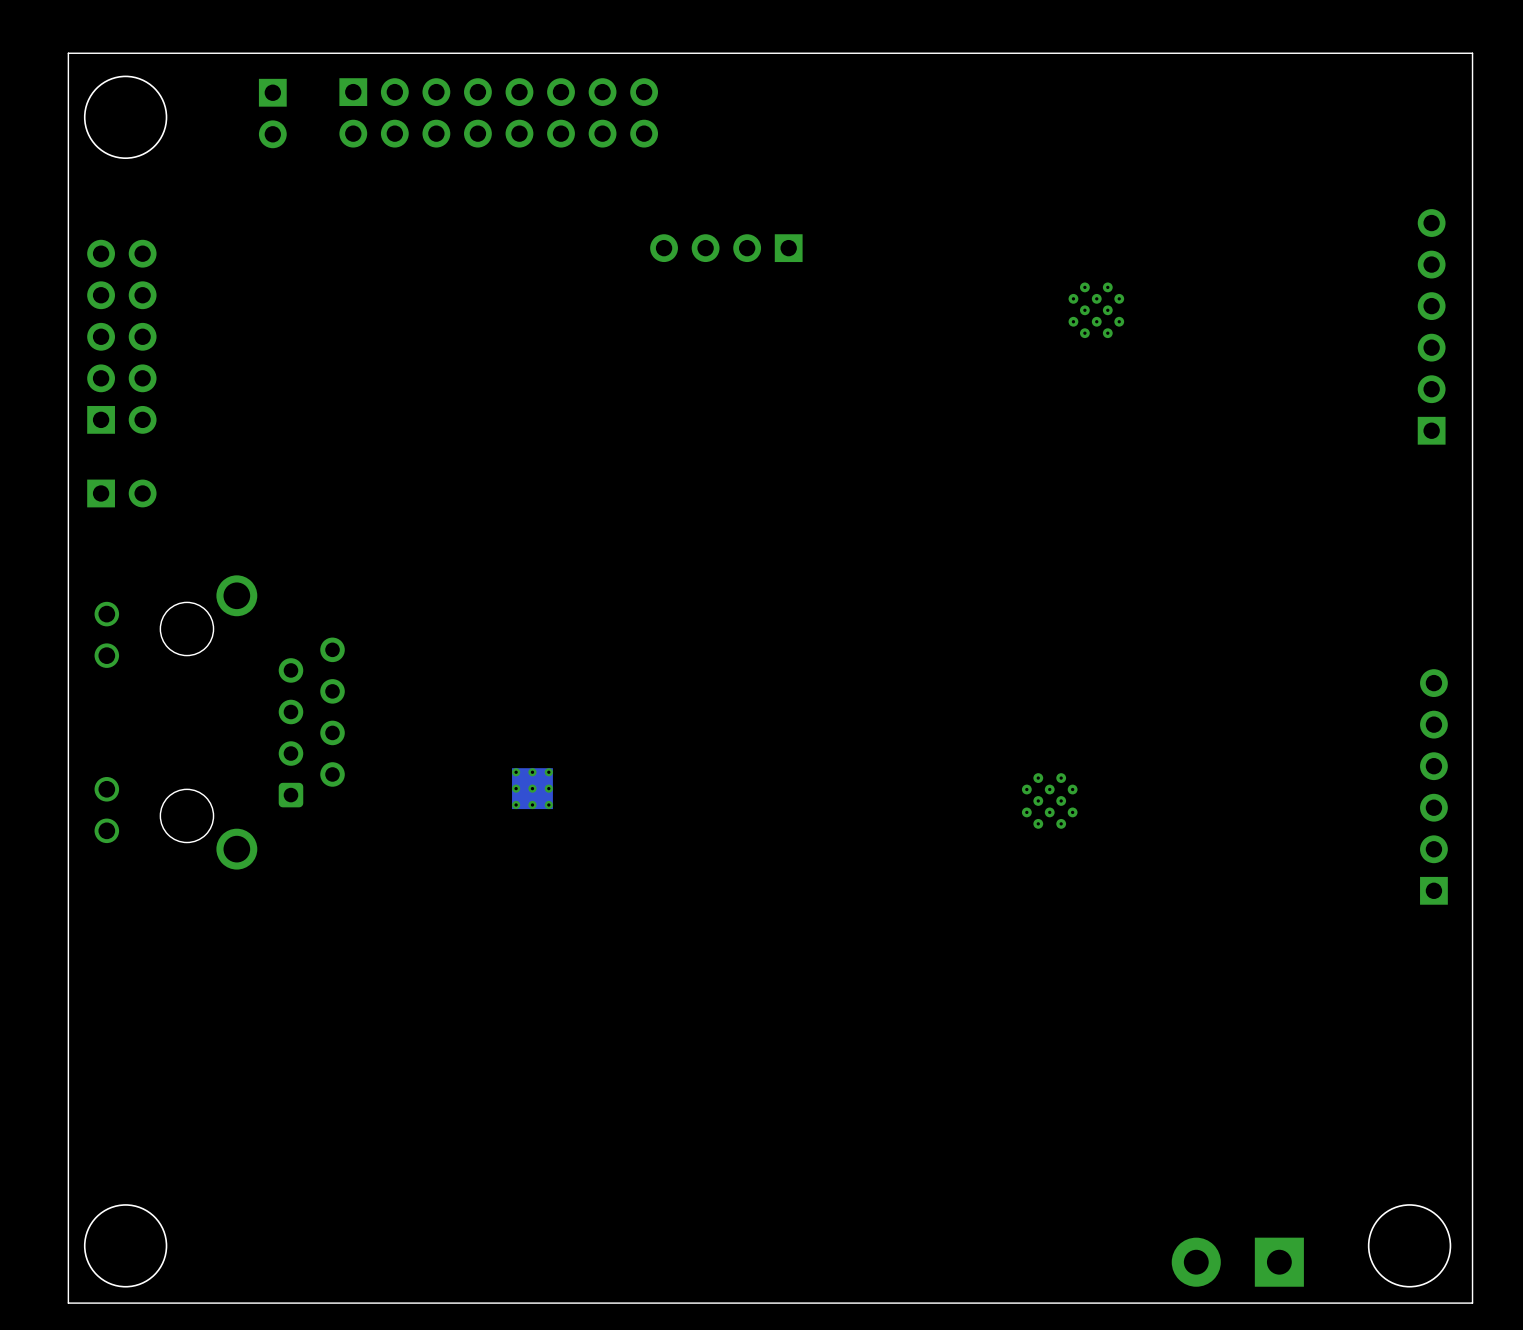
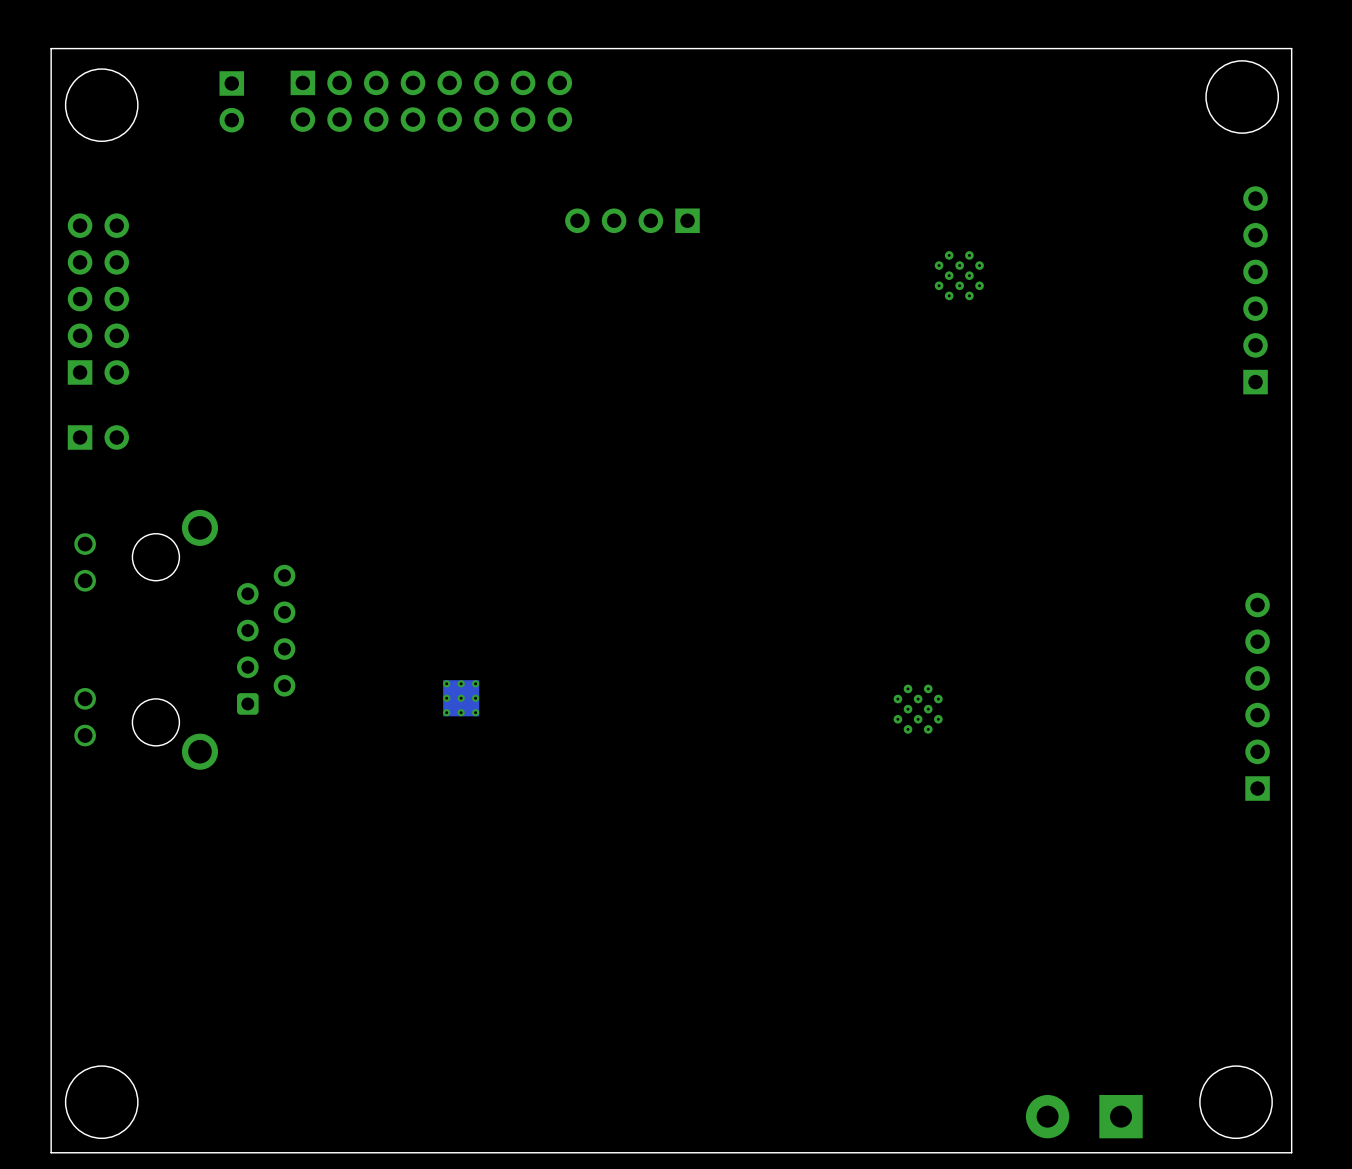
round board edge: none -> [1205, 60, 1280, 134]

